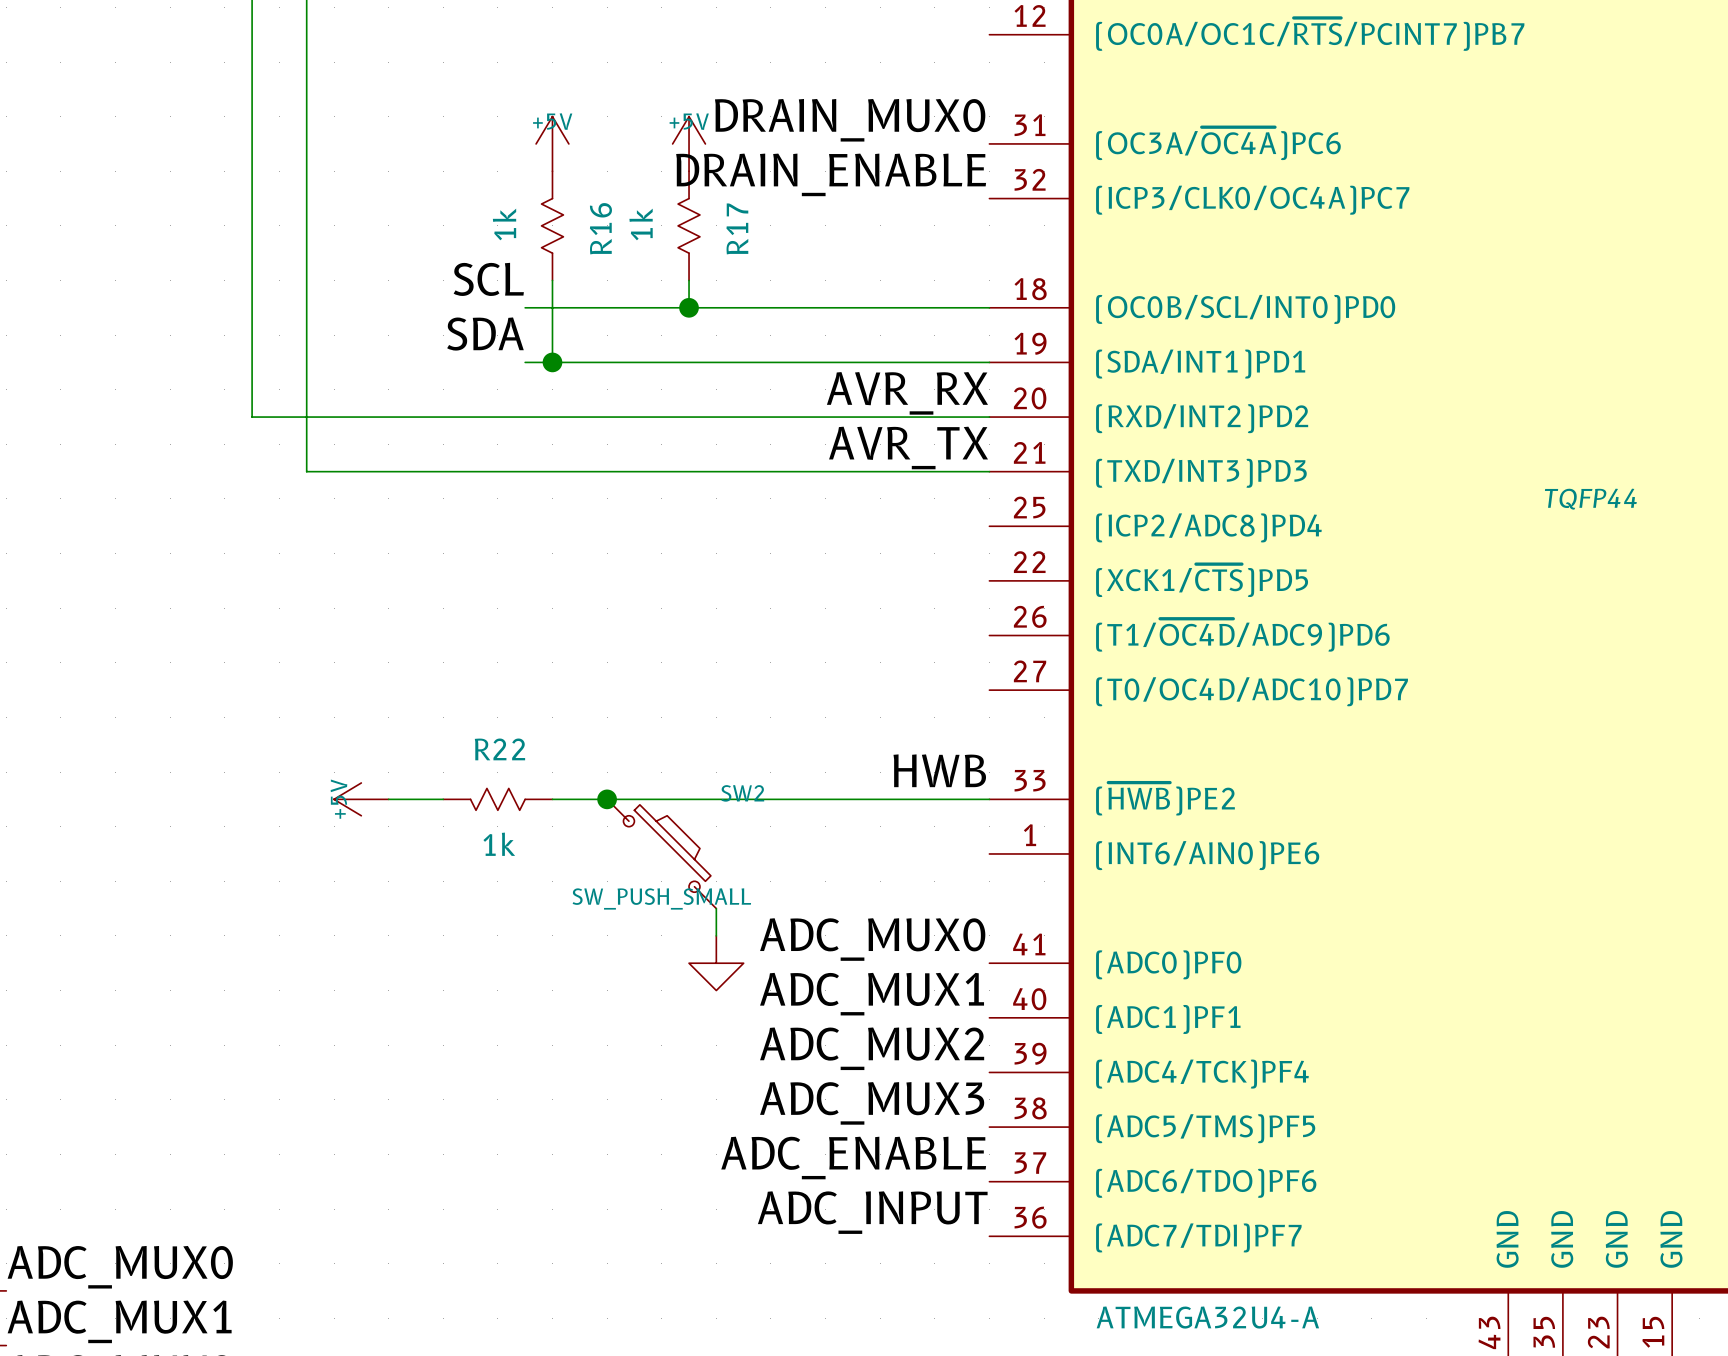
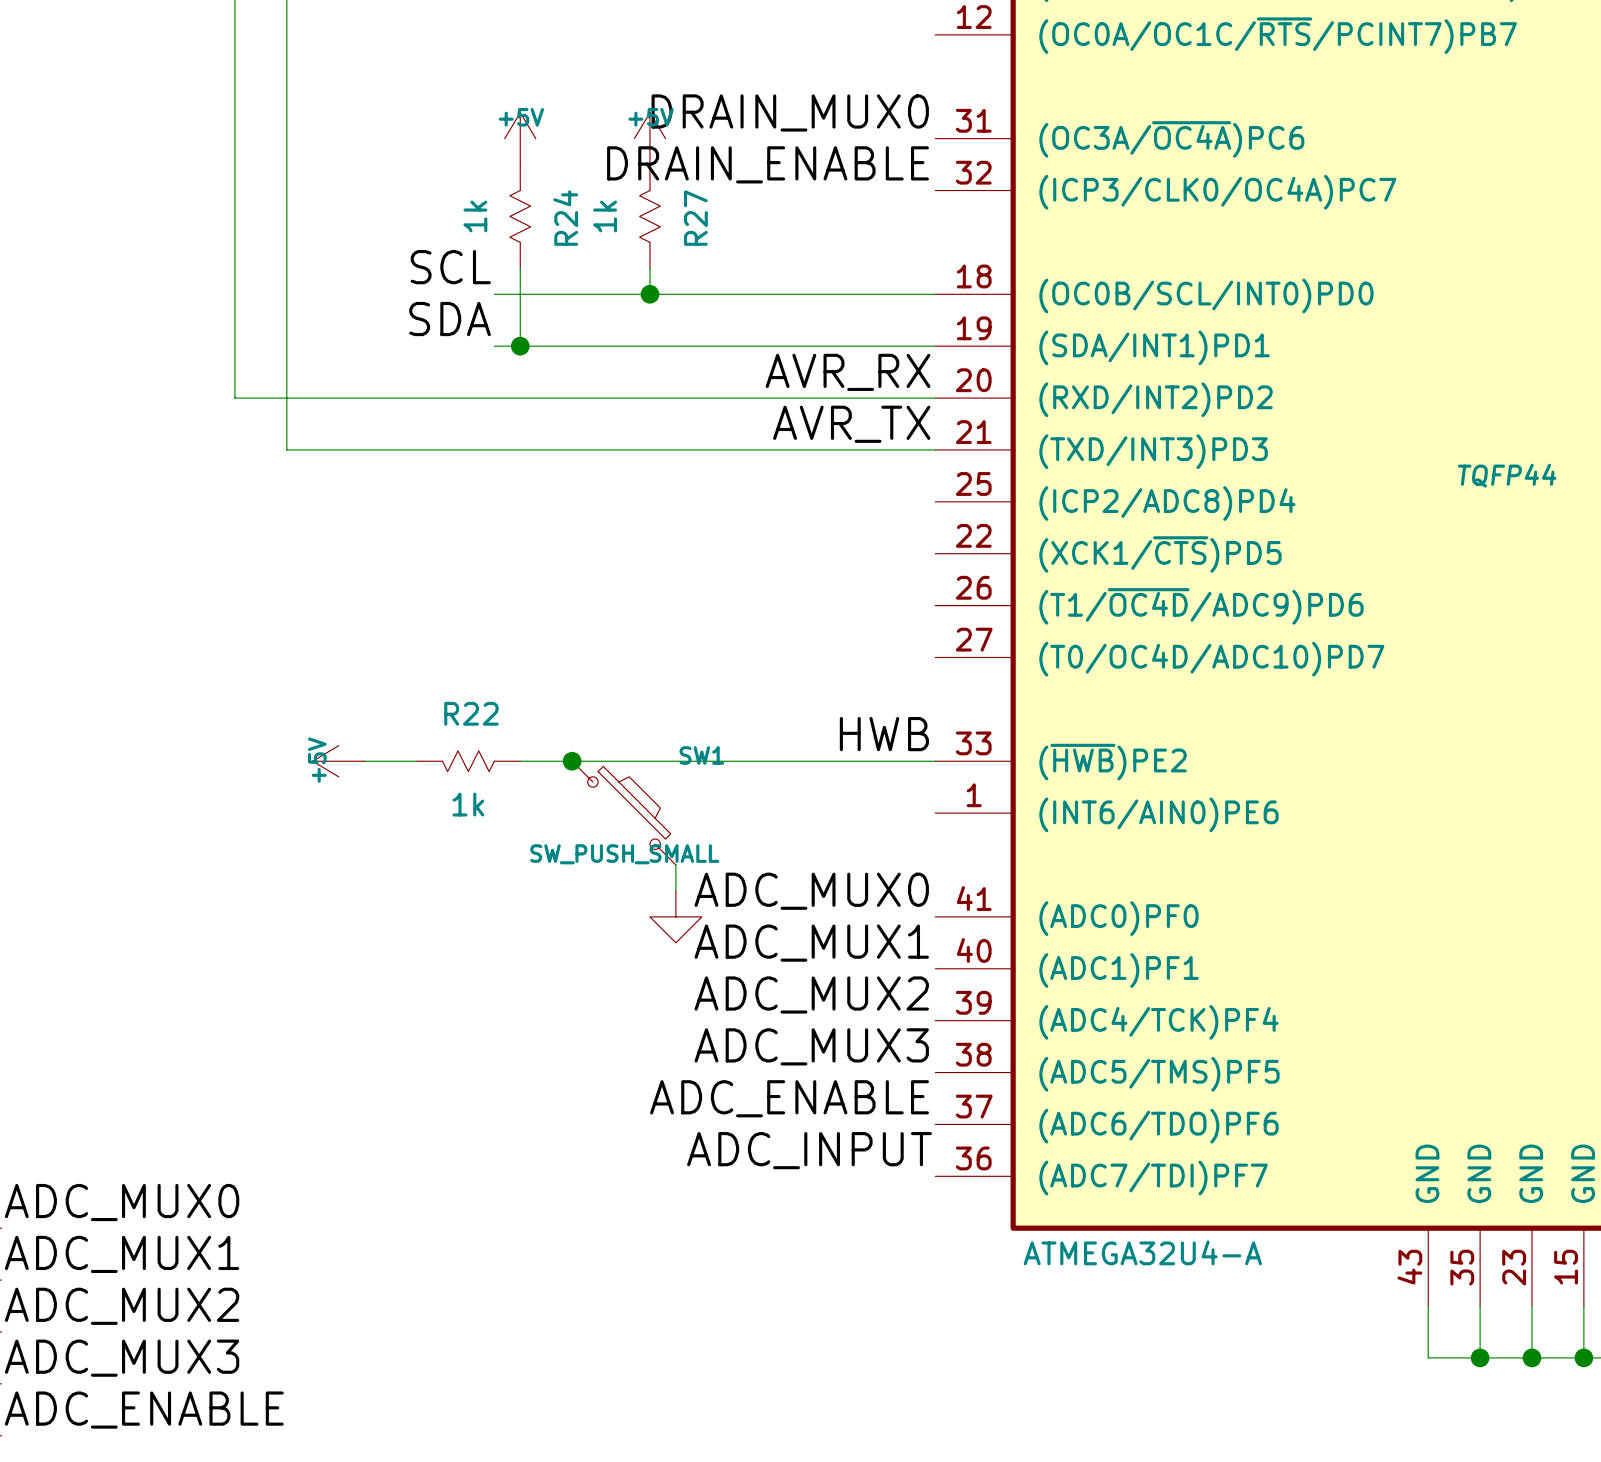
R16 name: R16 (600, 228) -> R24 (565, 218)
R17 name: R17 (737, 228) -> R27 (695, 218)
SW2 name: SW2 (742, 793) -> SW1 (701, 755)

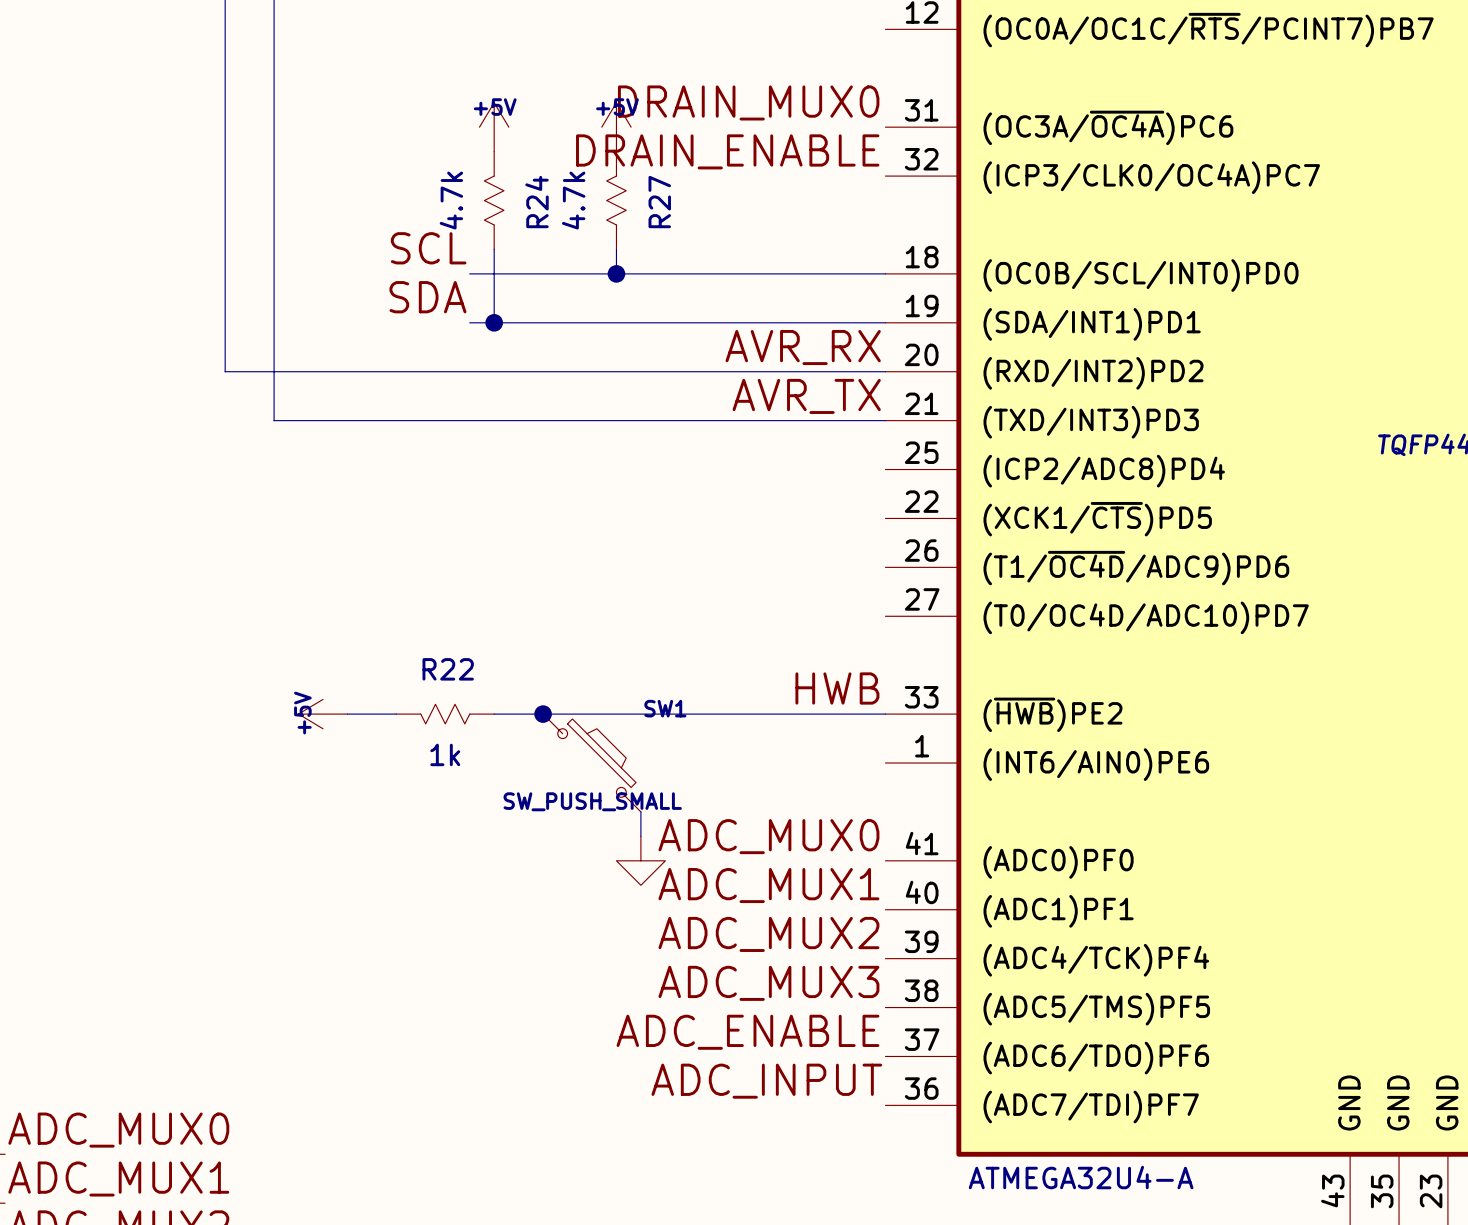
R24 value: 1k (475, 216) -> 4.7k (451, 200)
R27 value: 1k (605, 216) -> 4.7k (573, 200)

